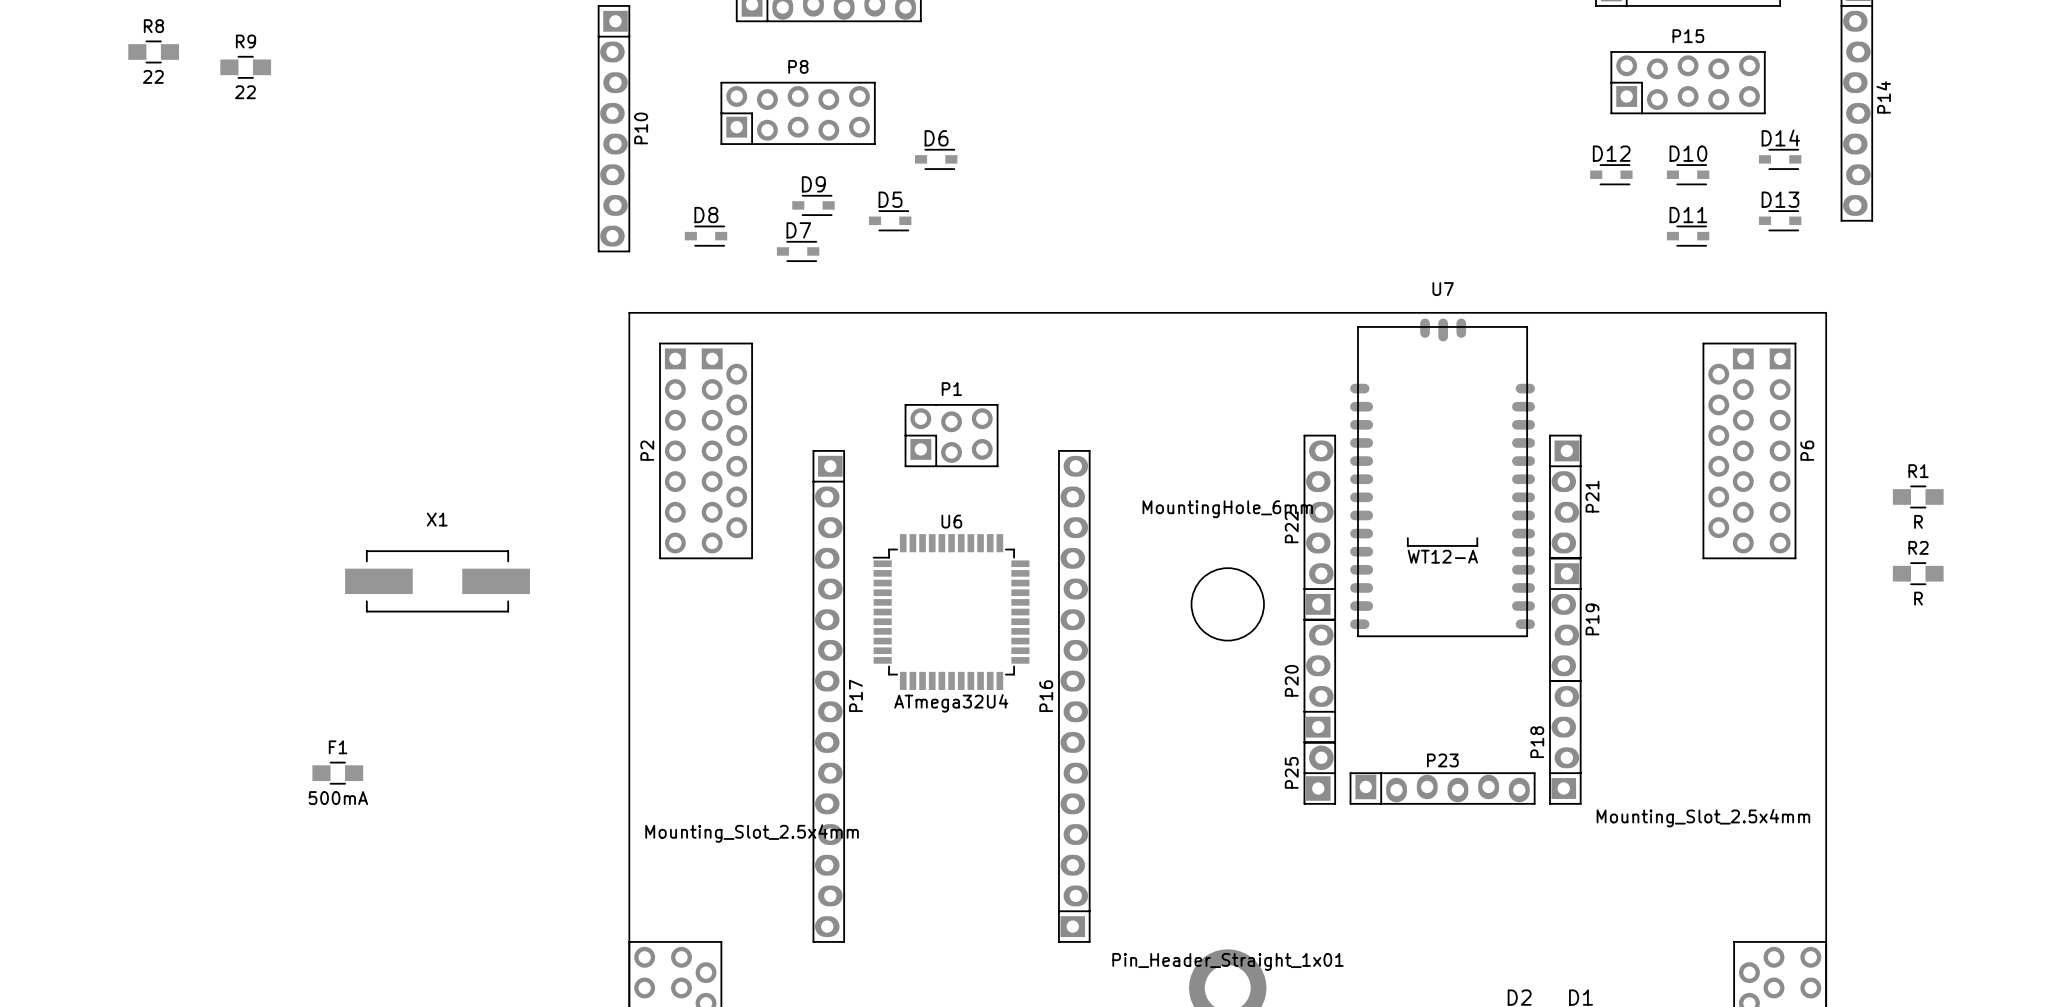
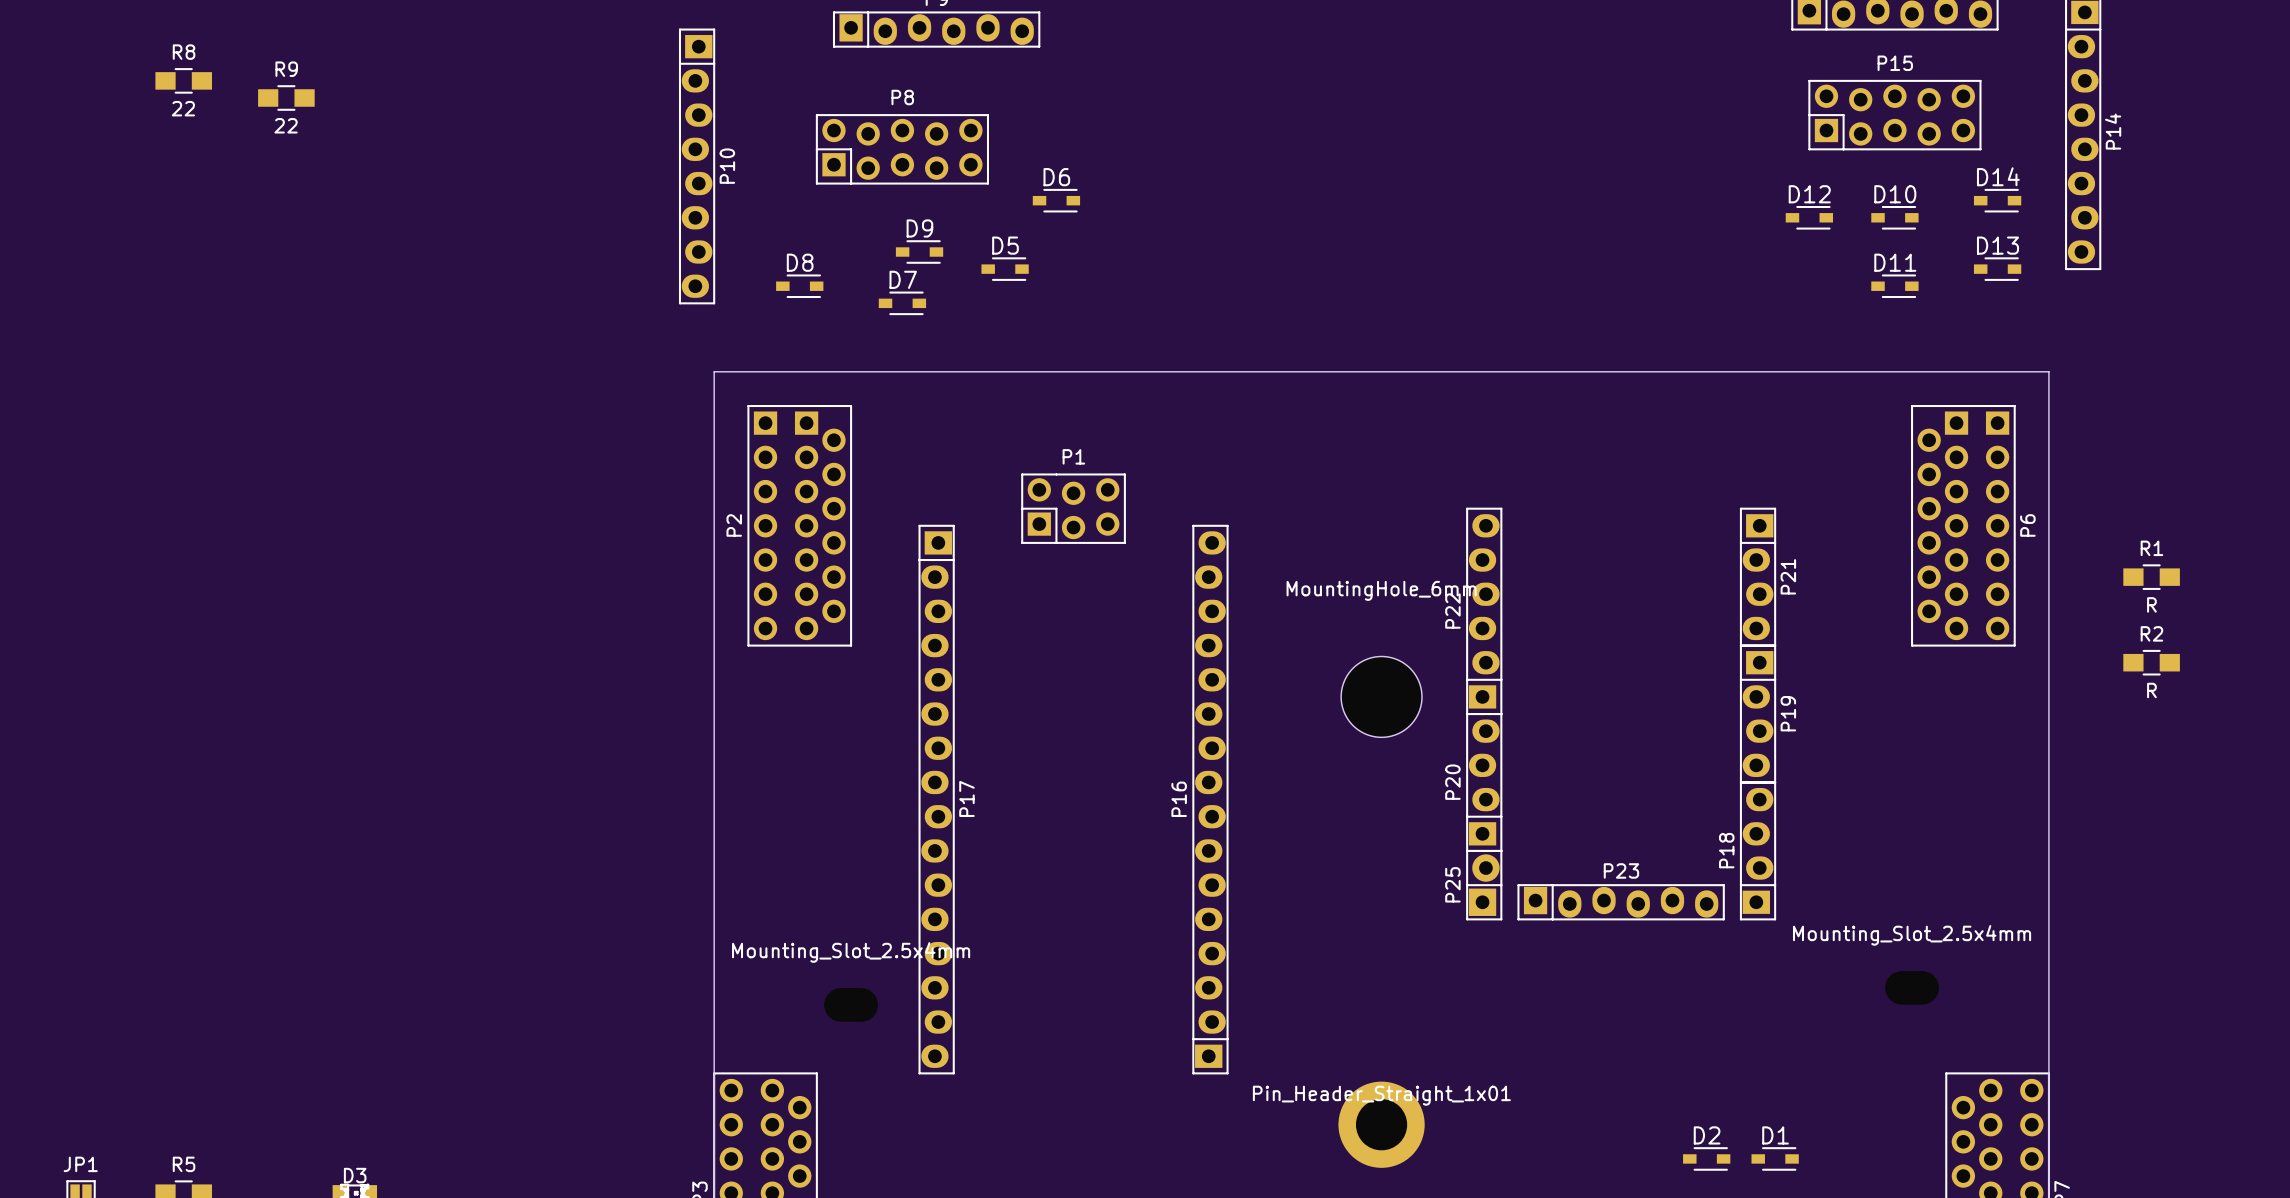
U7: WT12-A (1442, 477) -> none
X1: (437, 581) -> none
U6: ATmega32U4 (951, 612) -> none
F1: 500mA (337, 773) -> none

